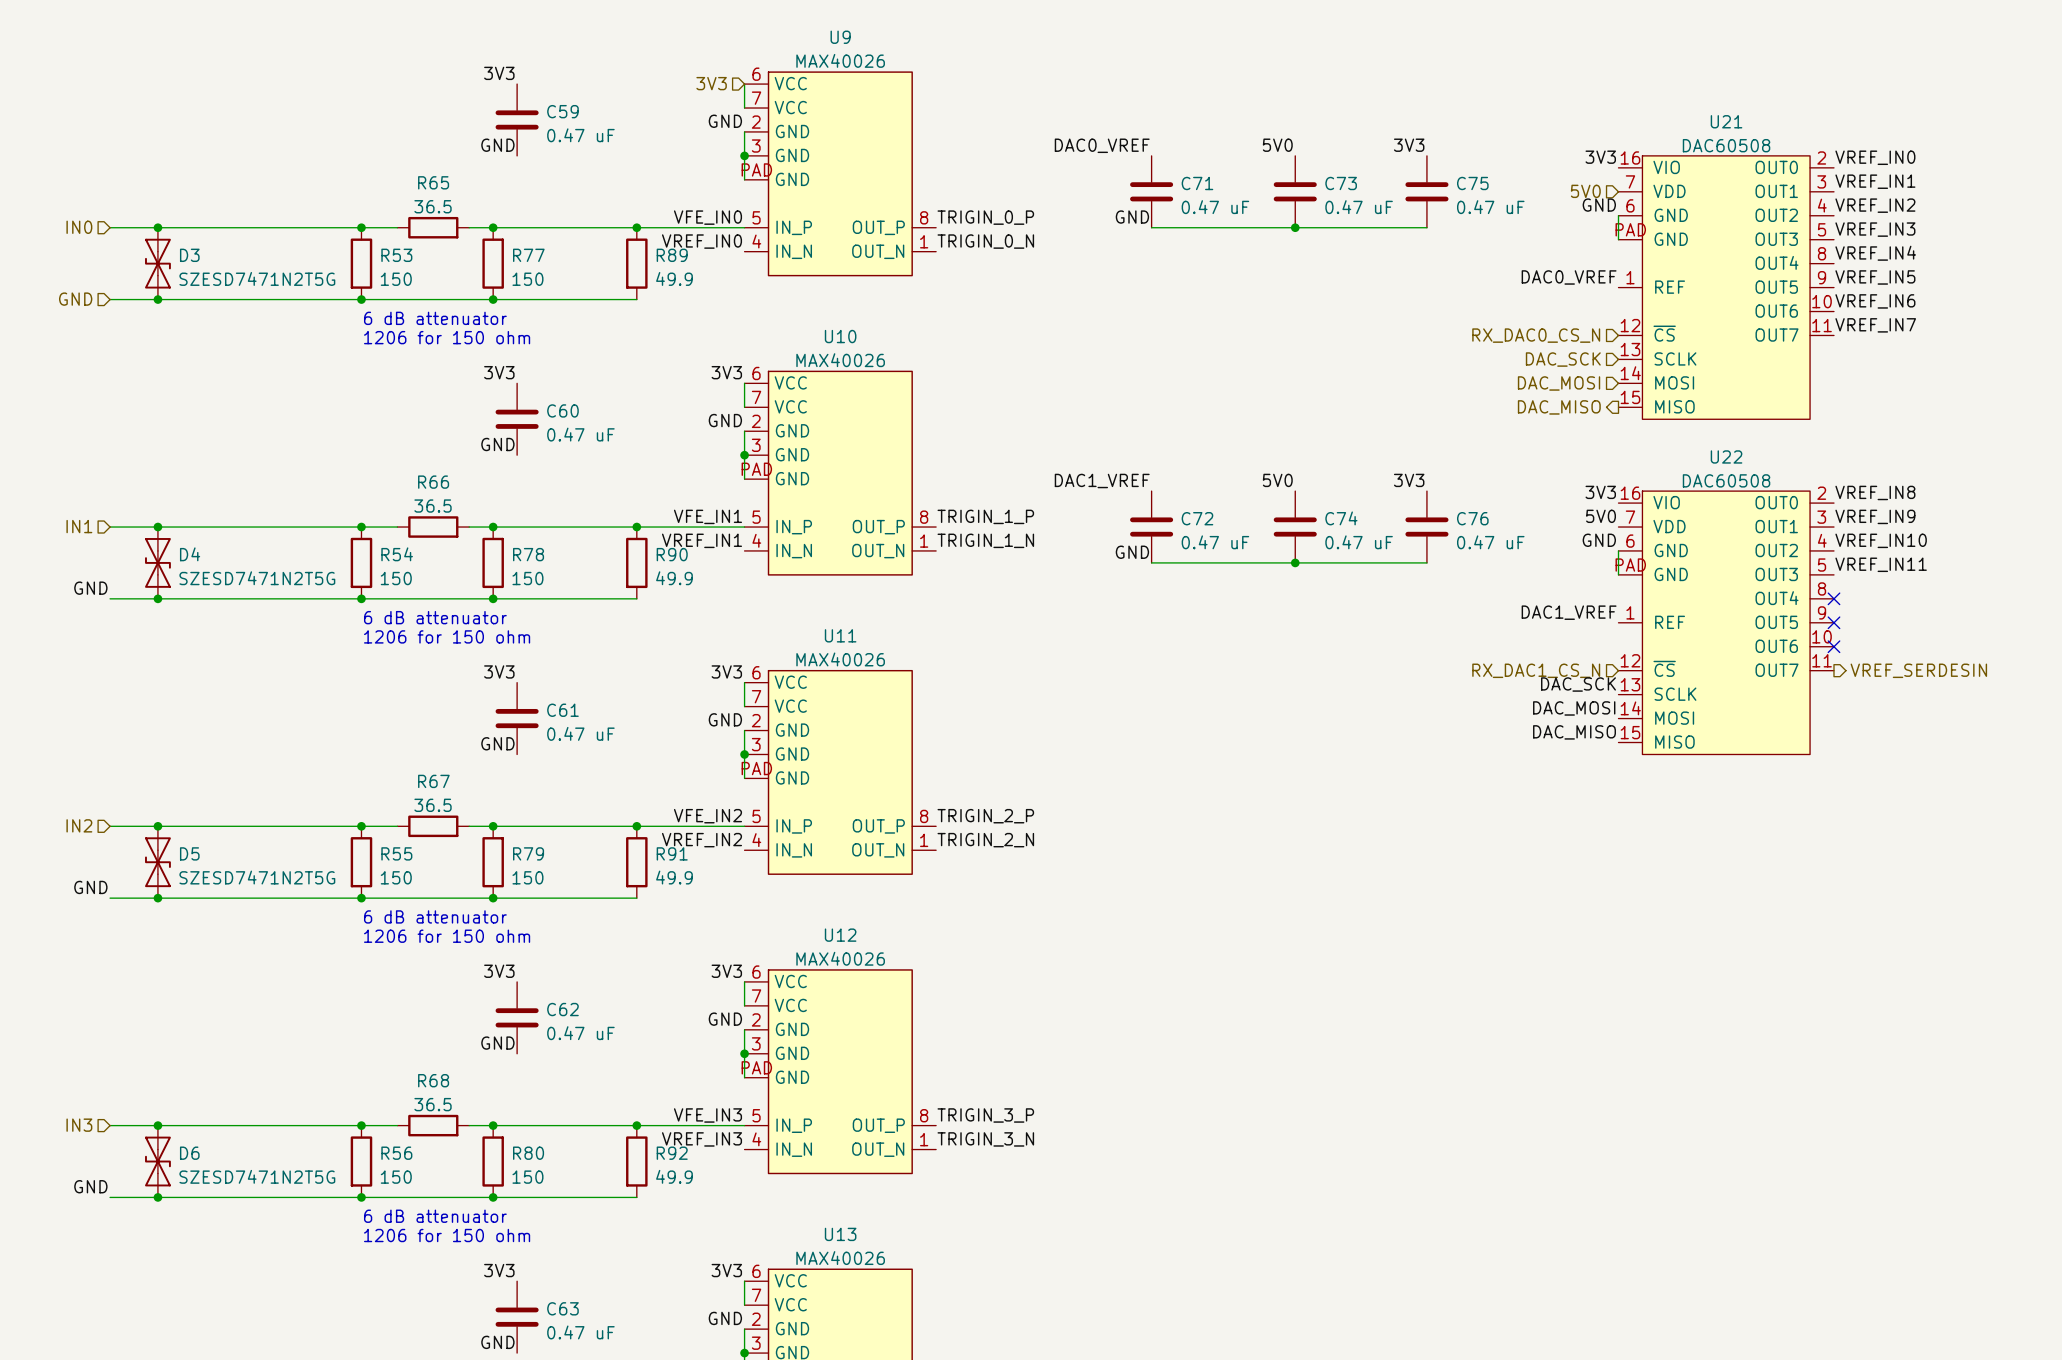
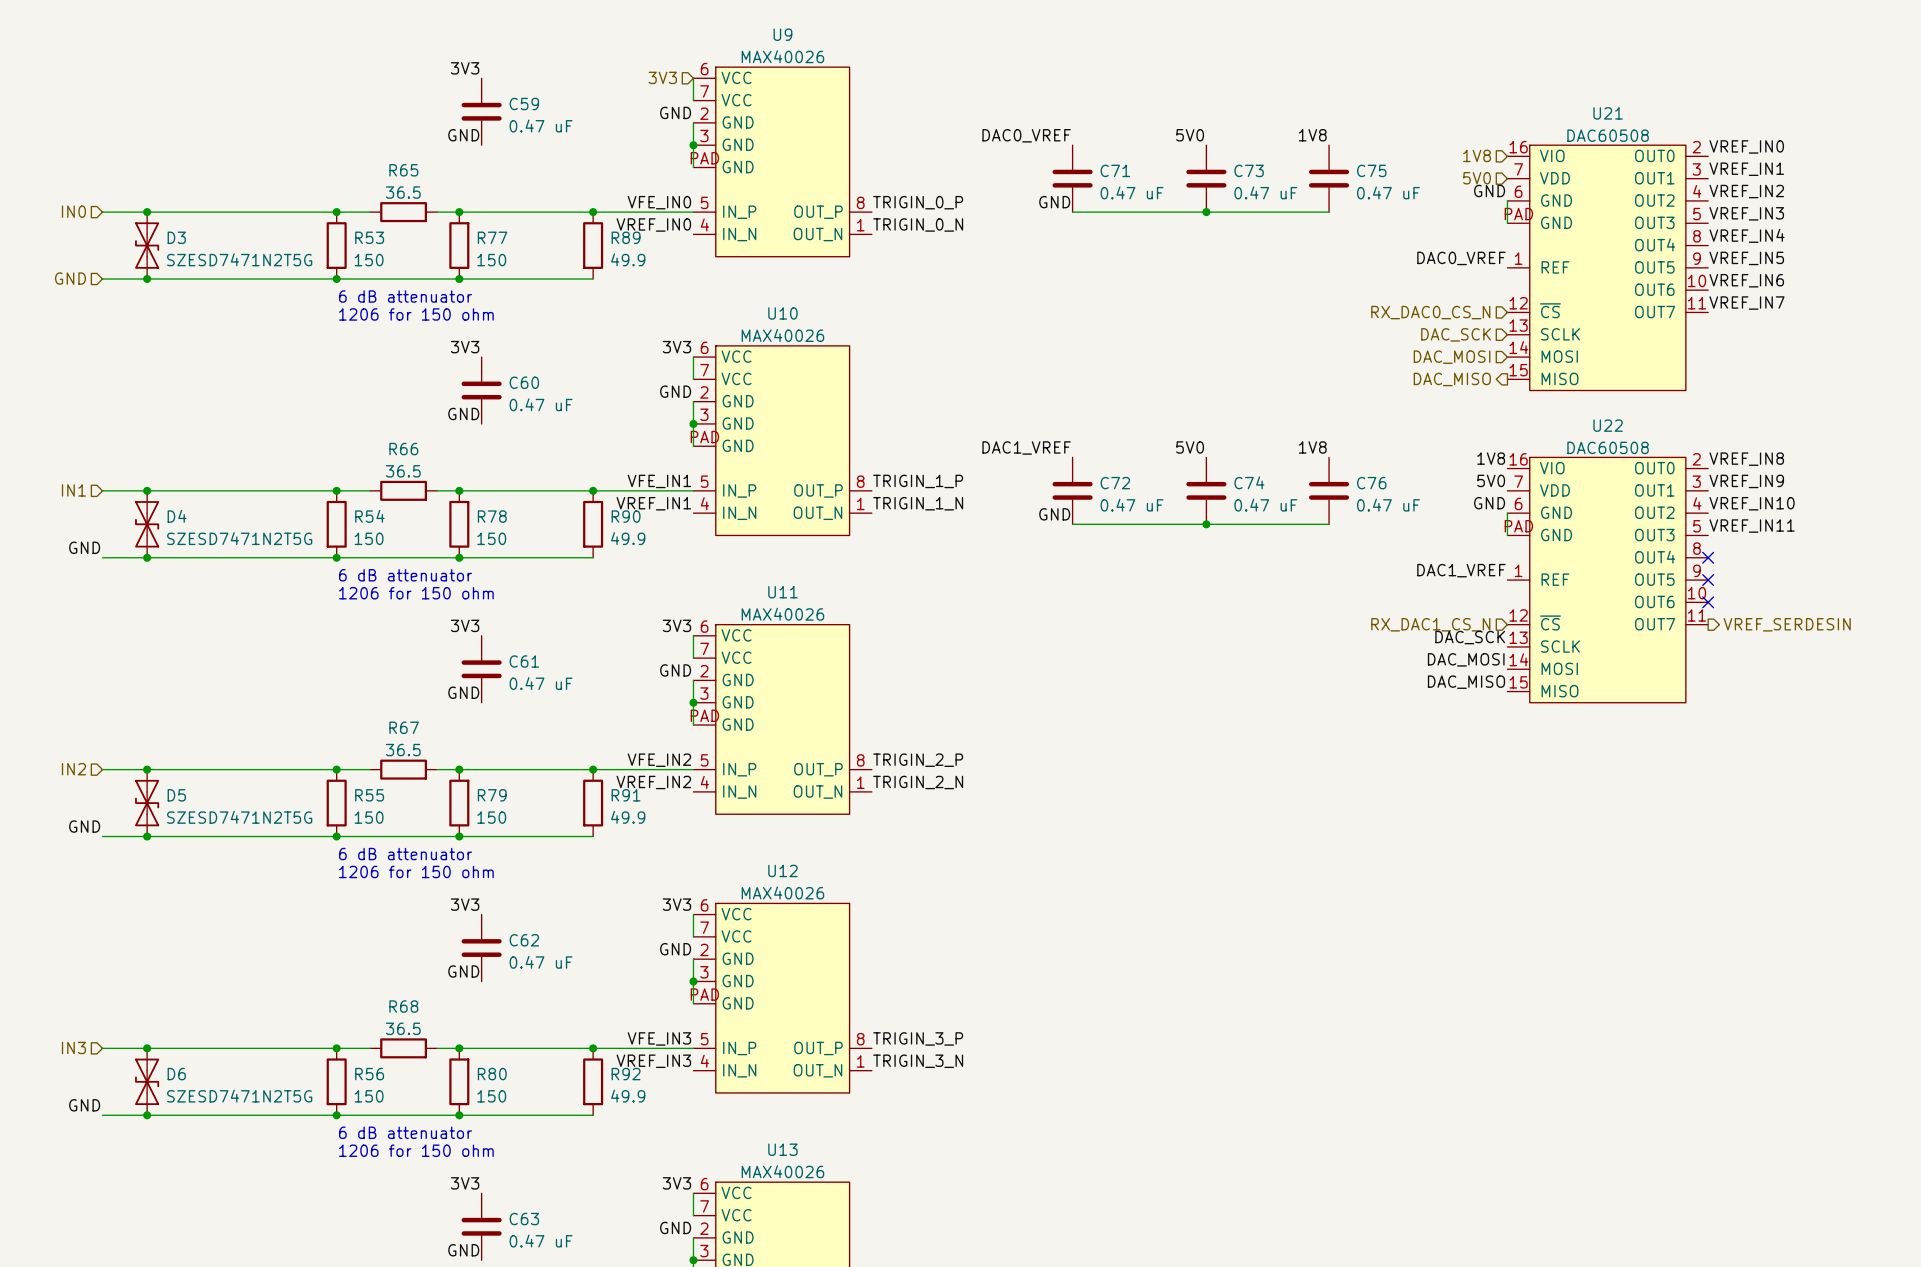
label: 3V3 (1409, 145) -> 1V8 (1312, 135)
label: 3V3 (1600, 157) -> none
hierarchical label: none -> 1V8 (1477, 155)
label: 3V3 (1409, 480) -> 1V8 (1312, 447)
label: 3V3 (1600, 492) -> 1V8 (1491, 458)

